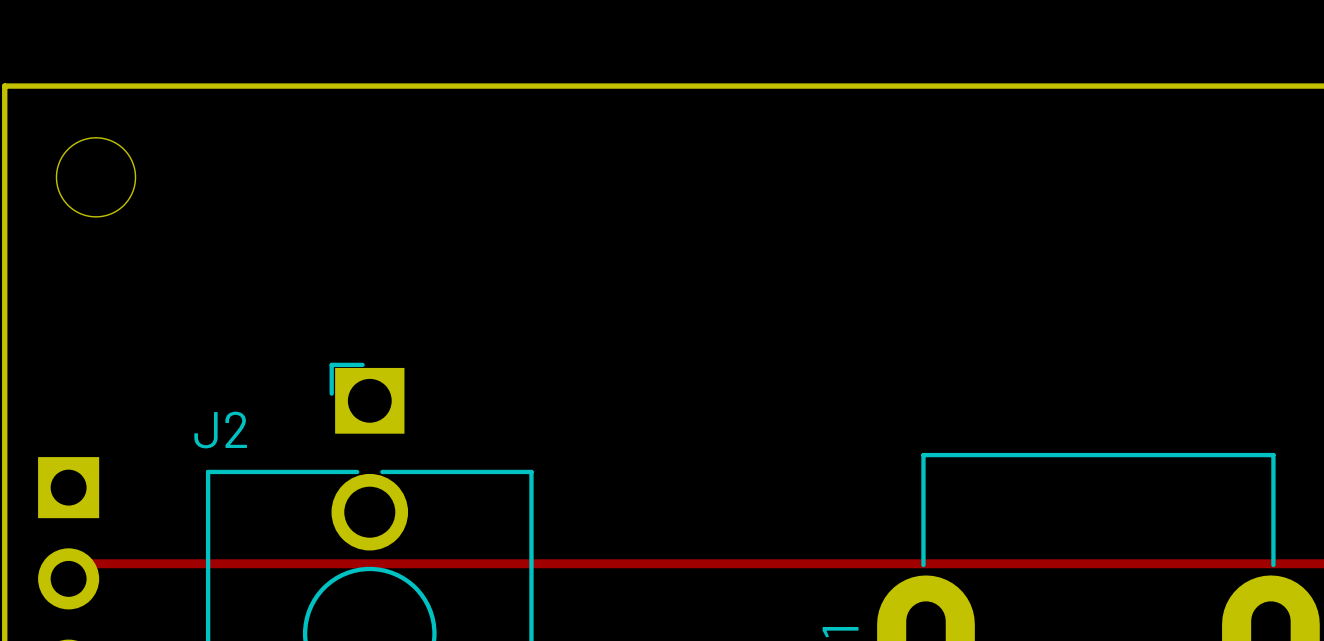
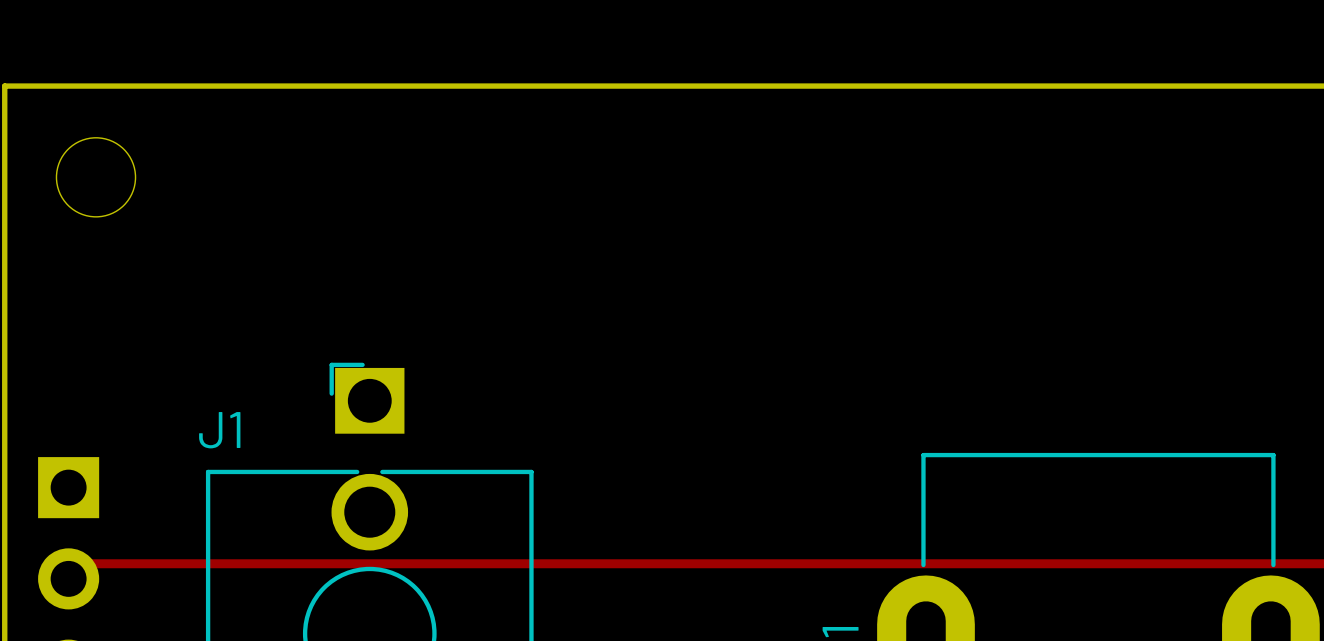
J2 name: J2 (220, 430) -> J1 (219, 430)

